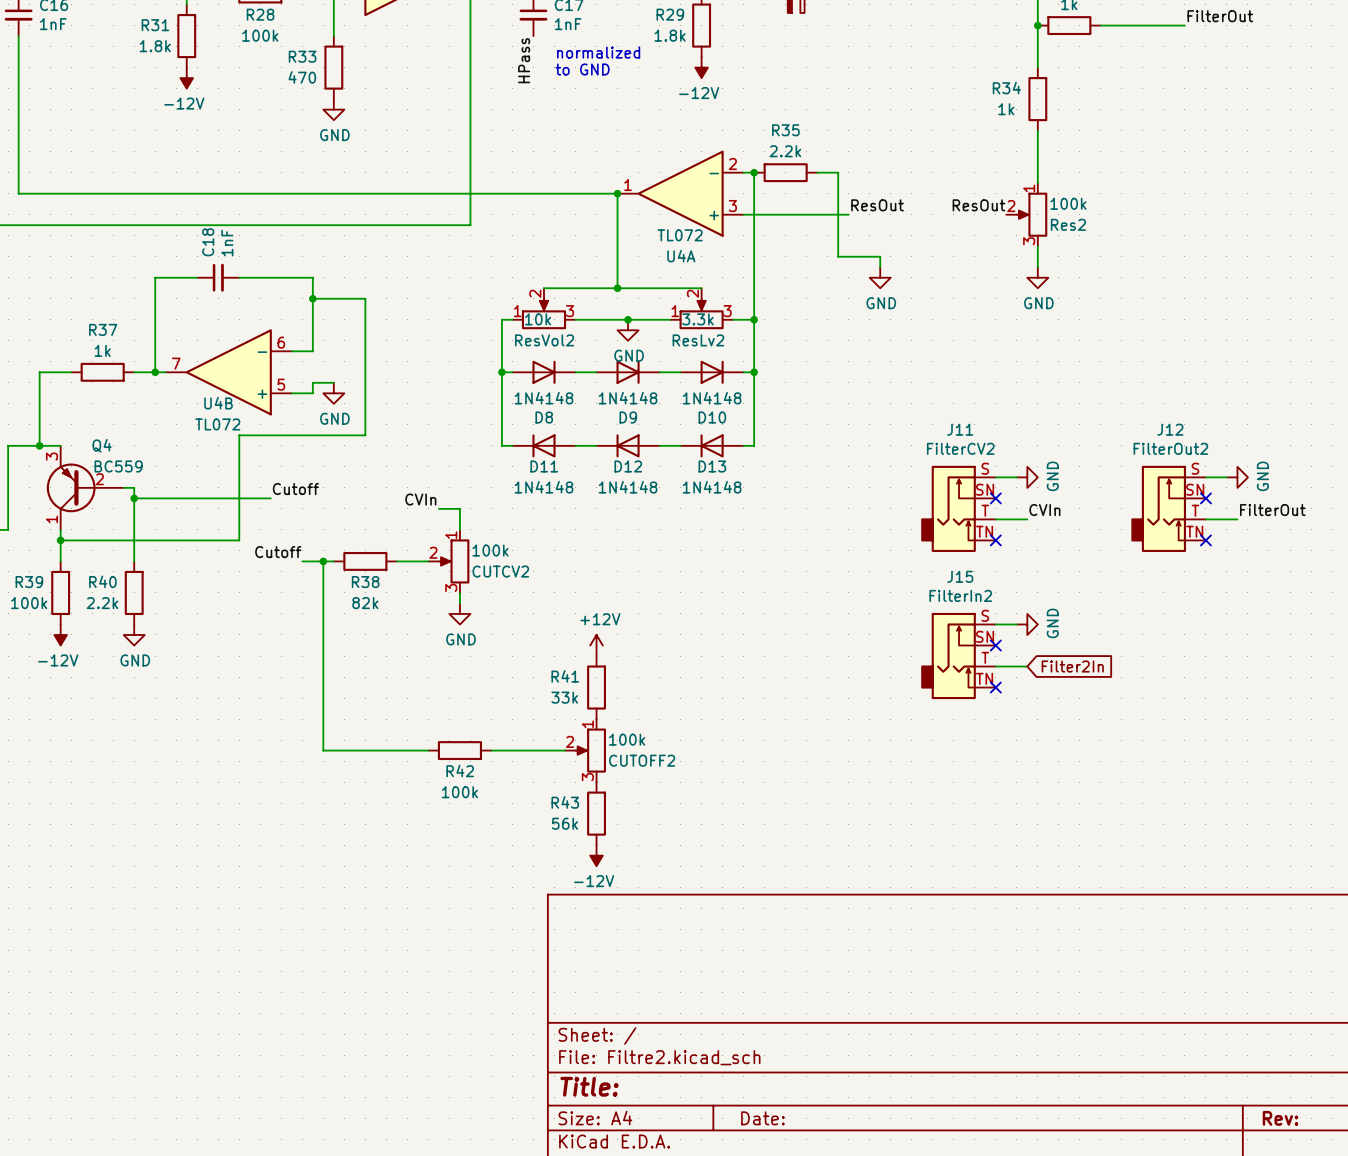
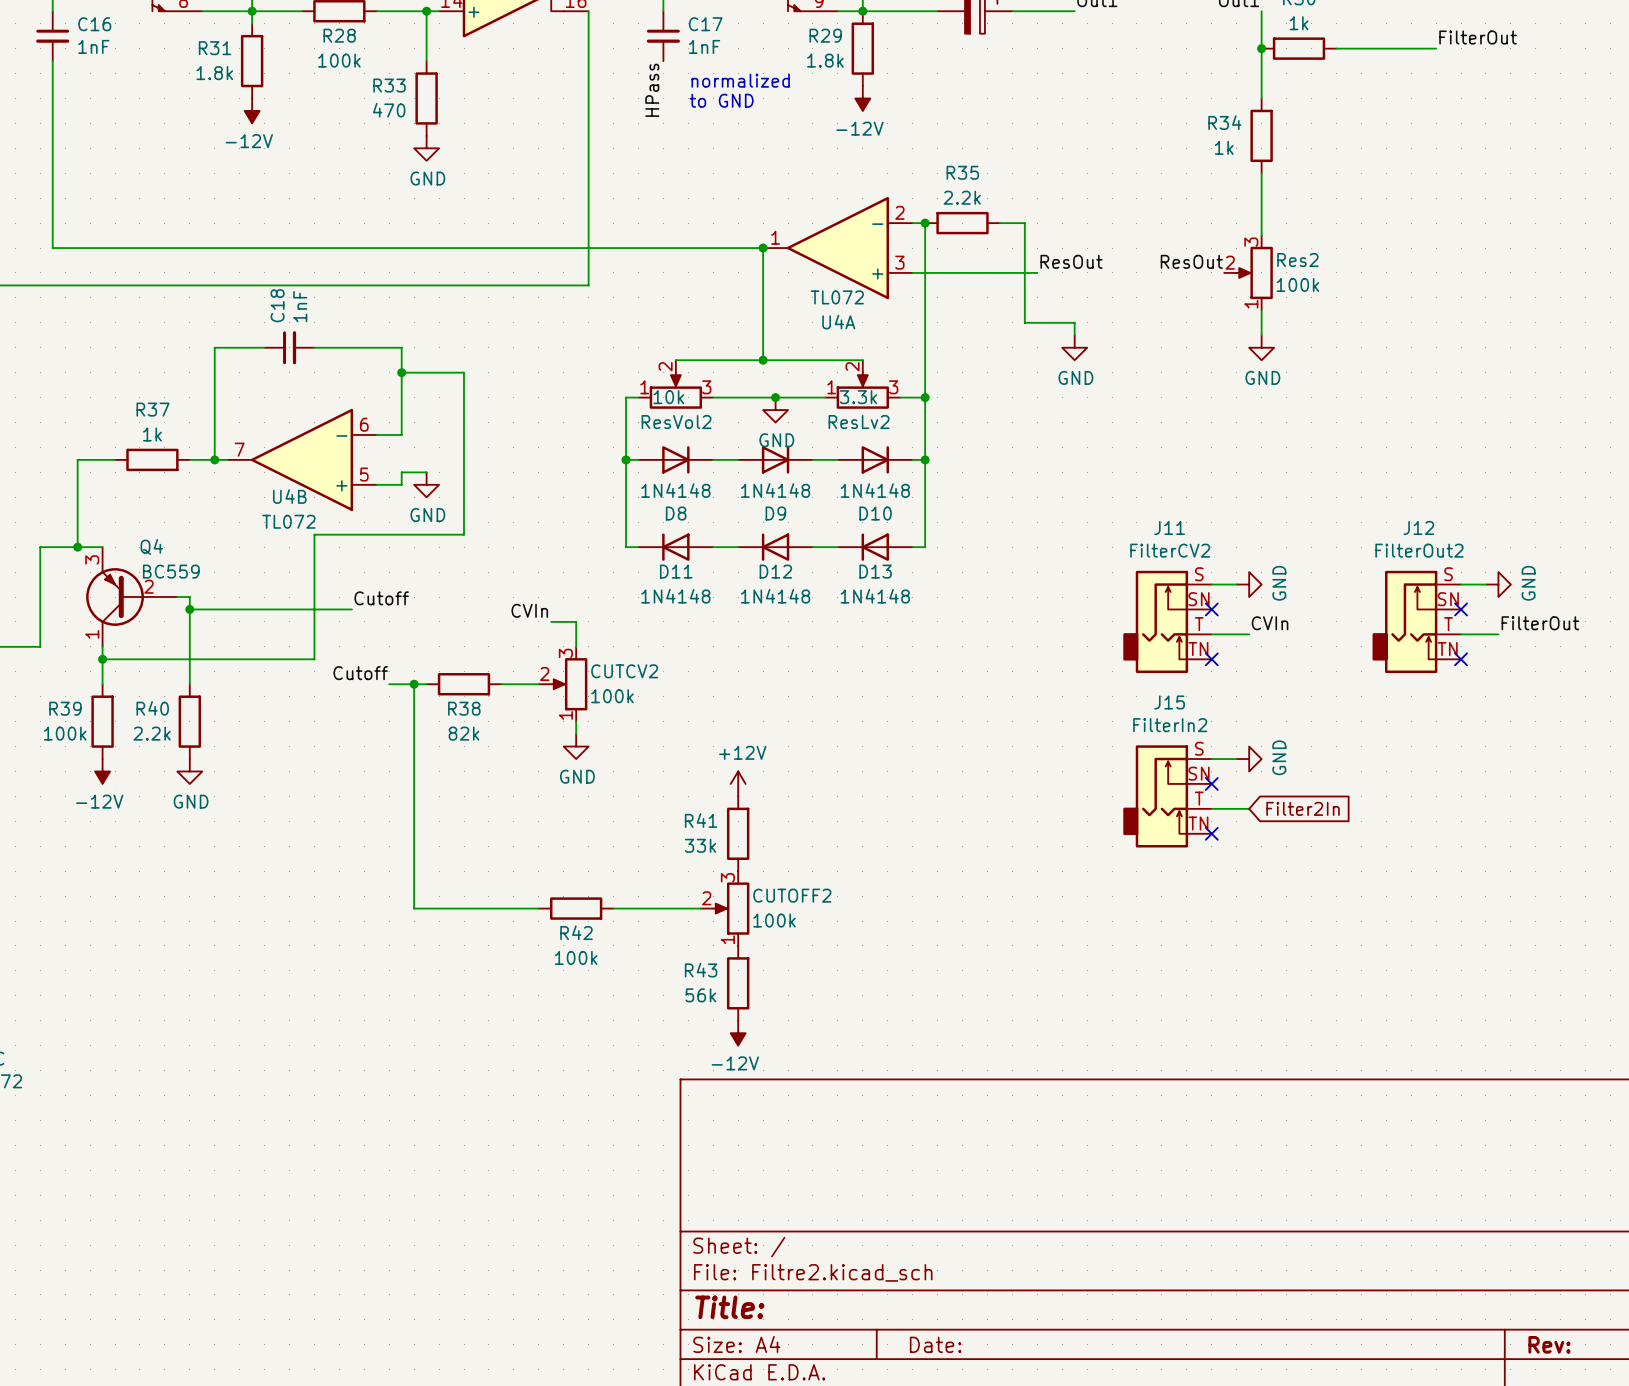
Res2 flip: as is (1032, 214) -> up-down (1254, 272)
CUTCV2 flip: as is (454, 561) -> up-down (569, 684)
CUTOFF2 flip: as is (590, 750) -> up-down (731, 908)

